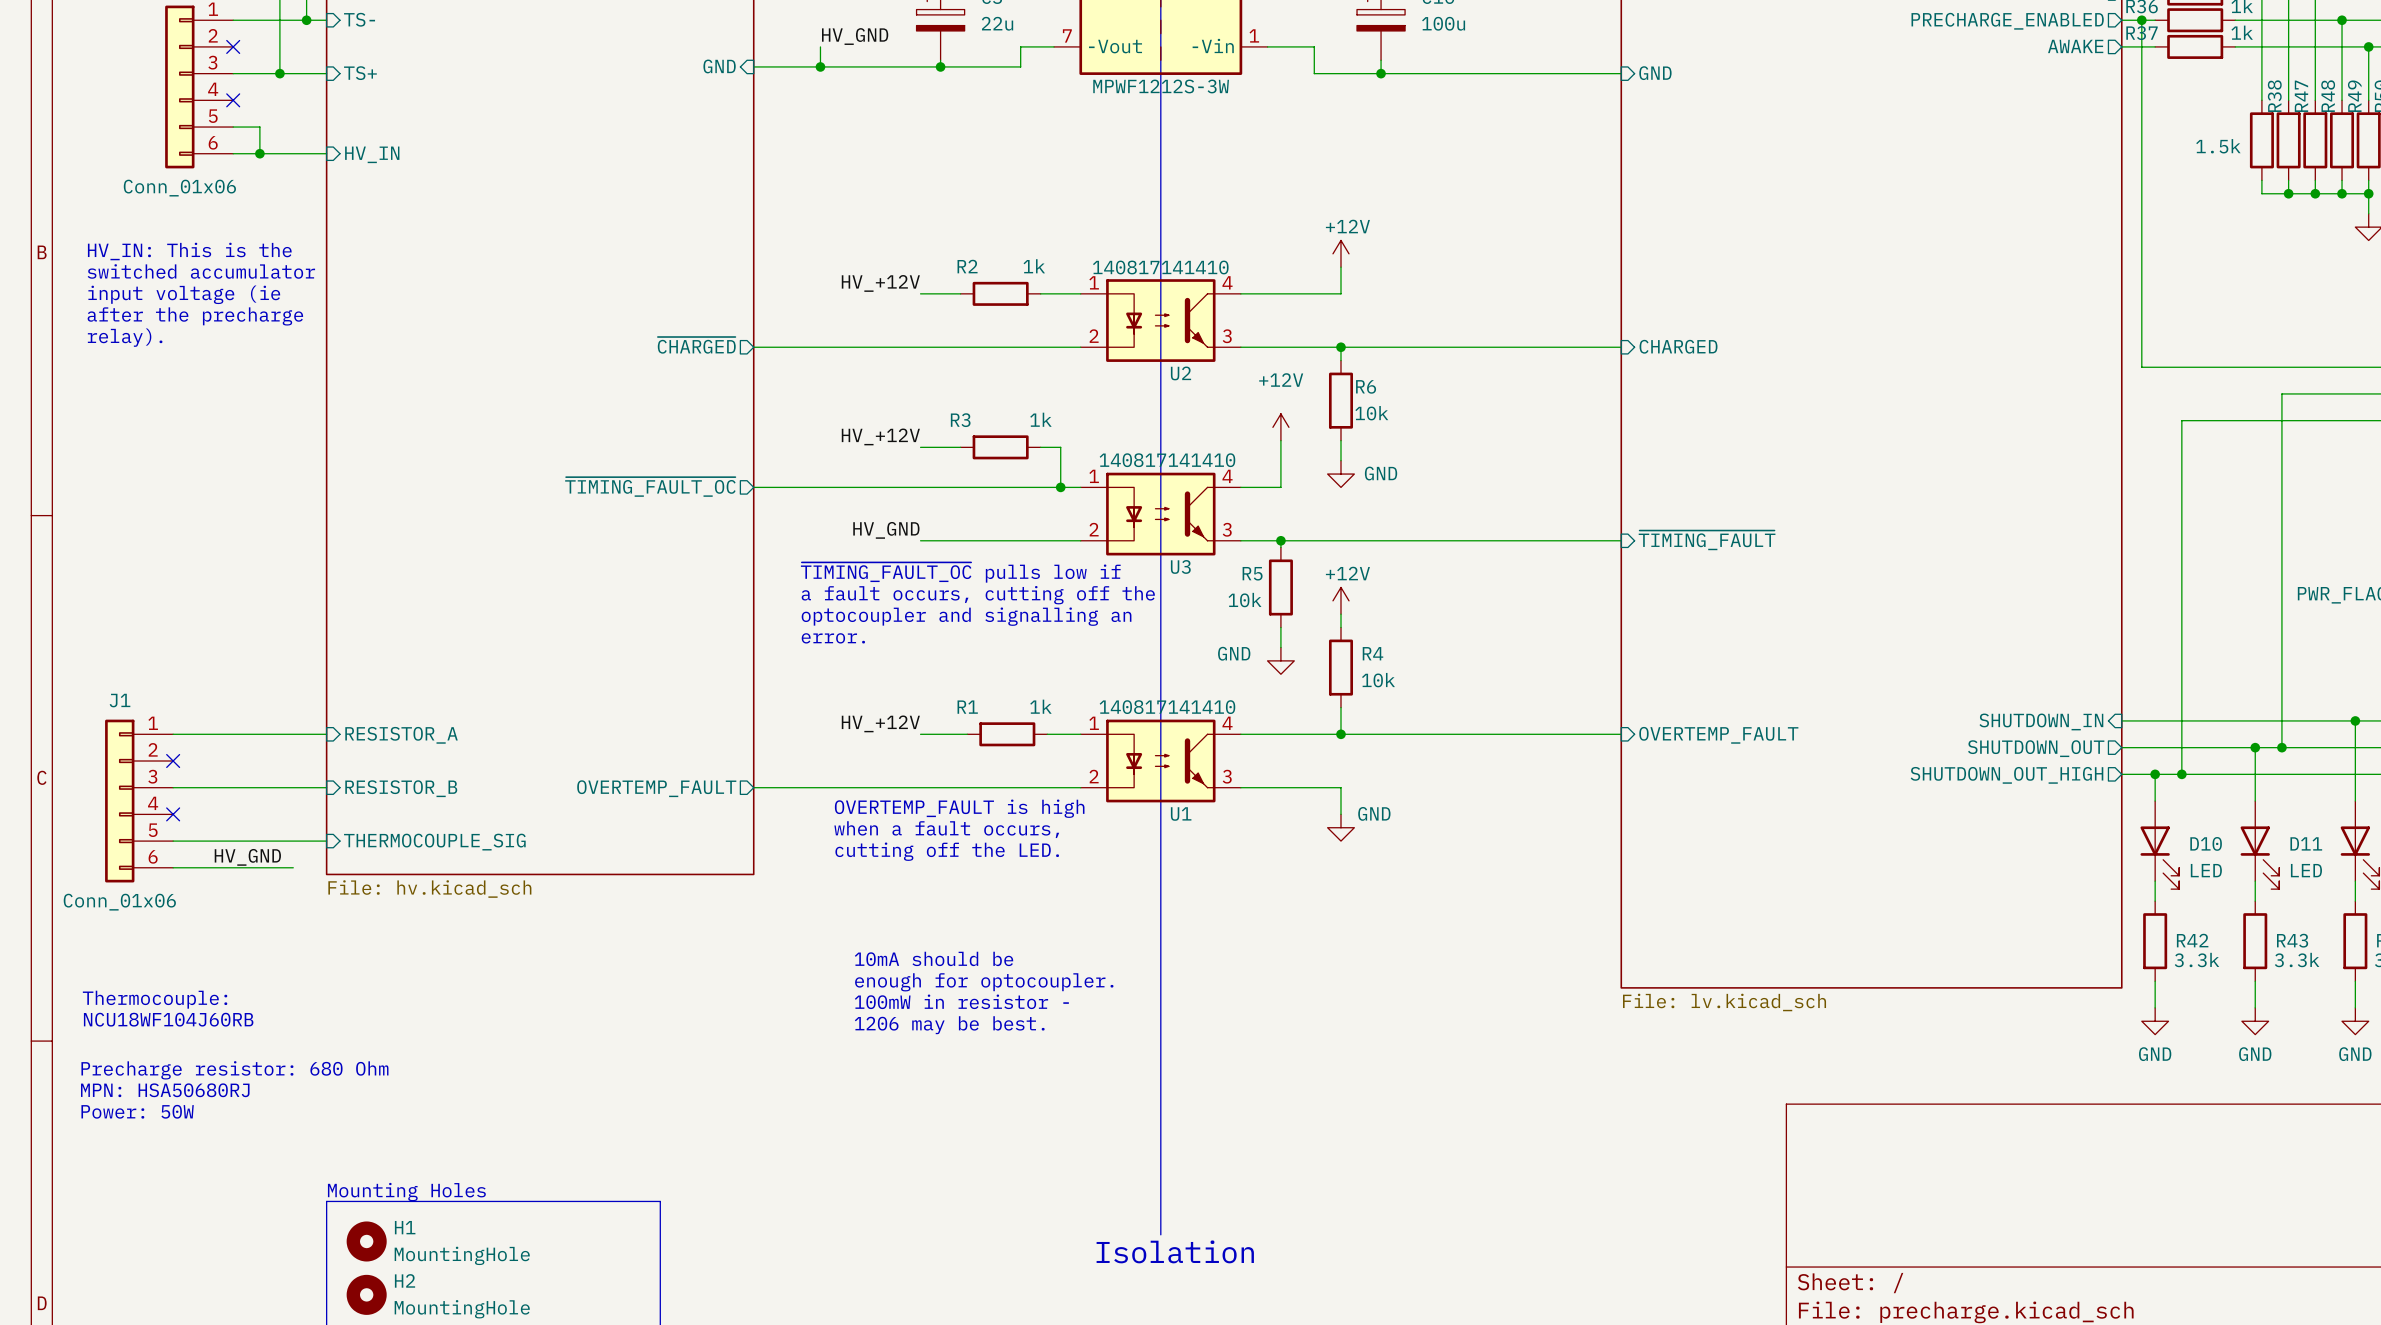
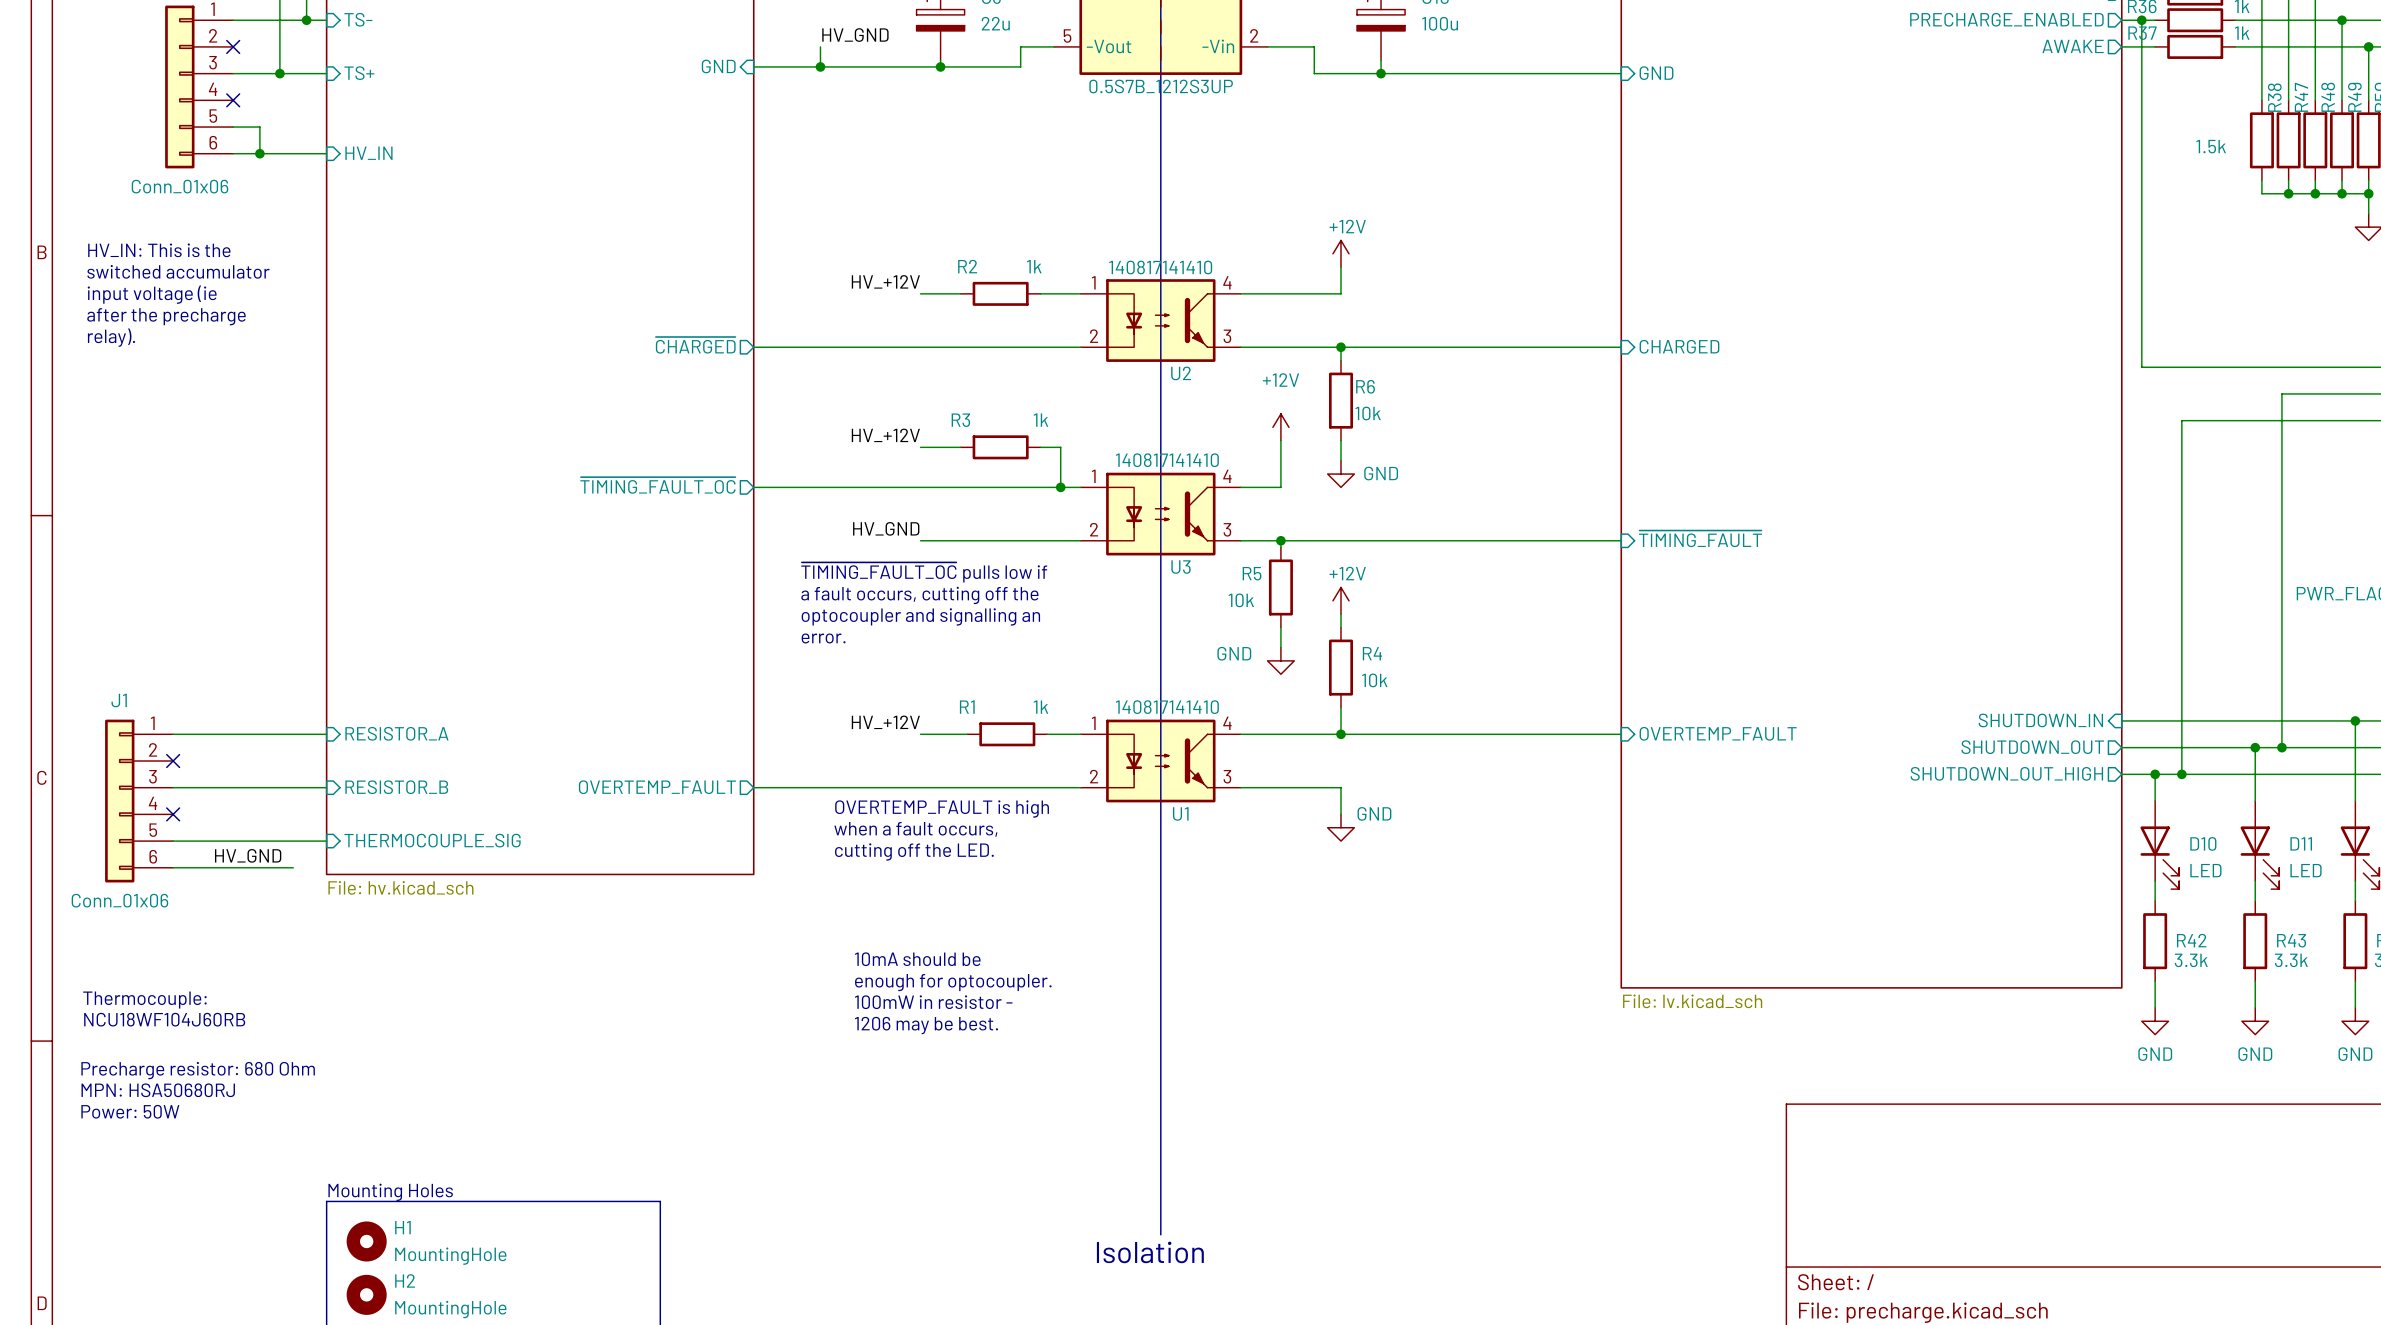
part pin number: 7 (1067, 35) -> 5 (1067, 36)
part pin number: 1 (1254, 35) -> 2 (1254, 35)
part value: MPWF1212S-3W (1161, 86) -> 0.5S7B_1212S3UP (1161, 86)

